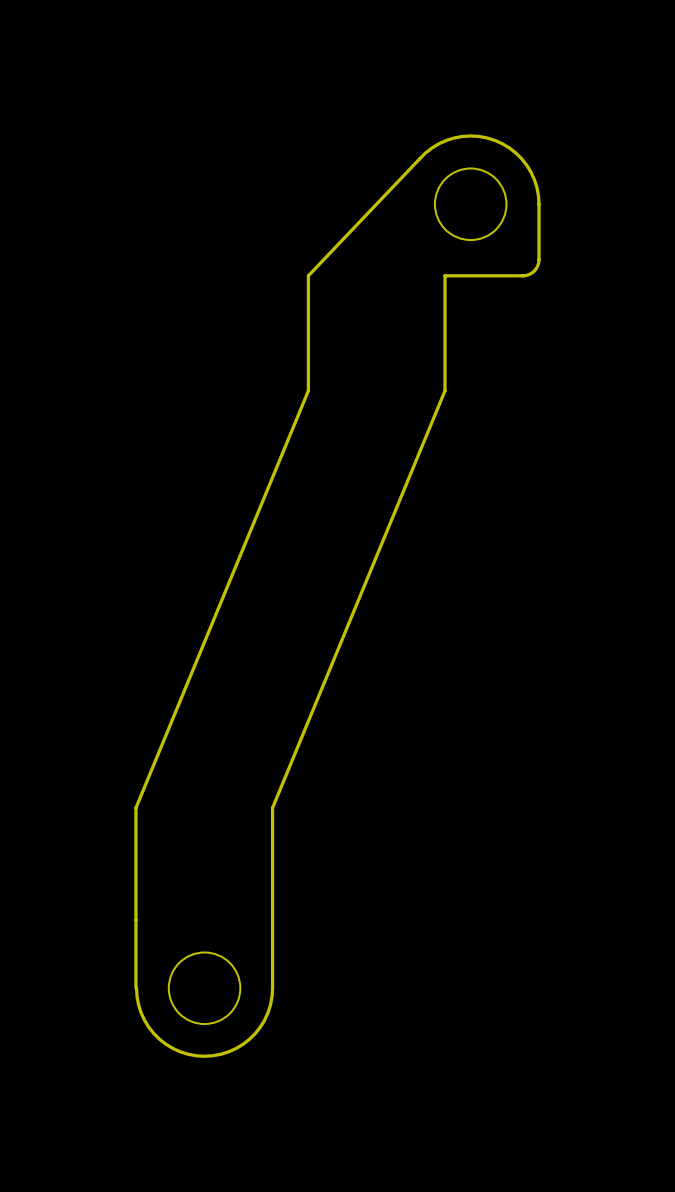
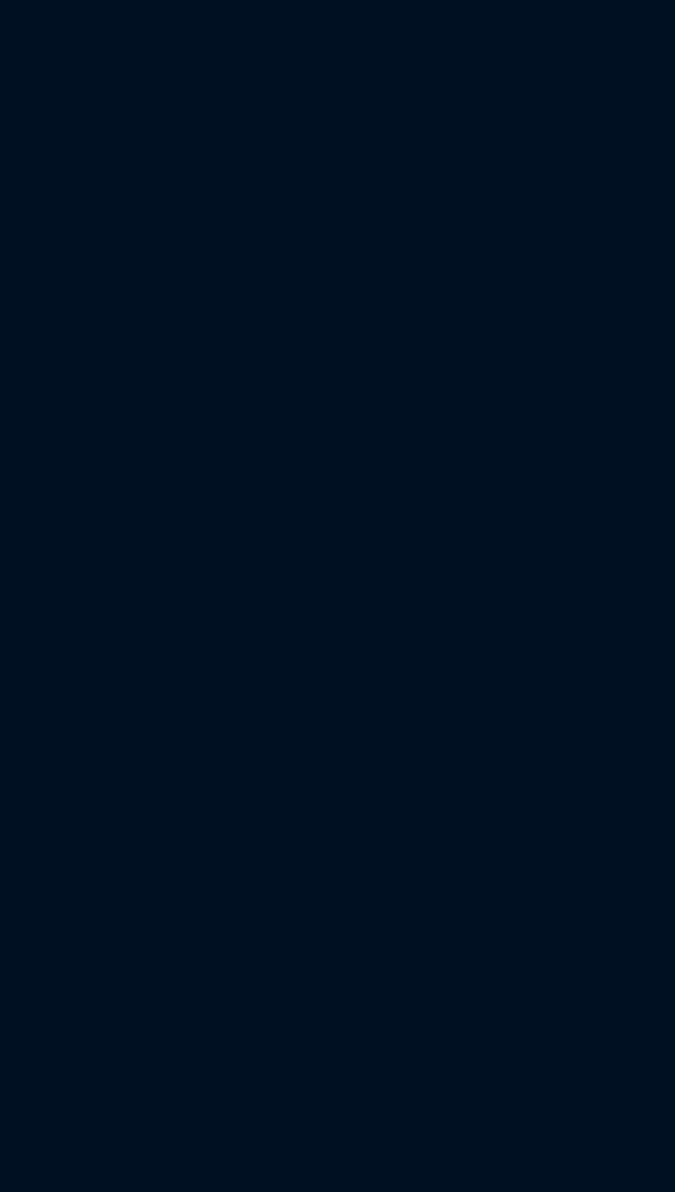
round board edge: [434, 167, 508, 241] -> none
round board edge: [167, 951, 242, 1025] -> none
board edge: (135, 988) (135, 807) (308, 390) (308, 275) (431, 148) (446, 140) (462, 136) (478, 136) (494, 140) (509, 148) (521, 158) (534, 180) (539, 204) (538, 263) (532, 272) (524, 275) (445, 275) (445, 390) (272, 807) (272, 988) (268, 1012) (255, 1033) (236, 1048) (212, 1055) (188, 1054) (165, 1044) (148, 1026) (138, 1004) (136, 988) -> none

